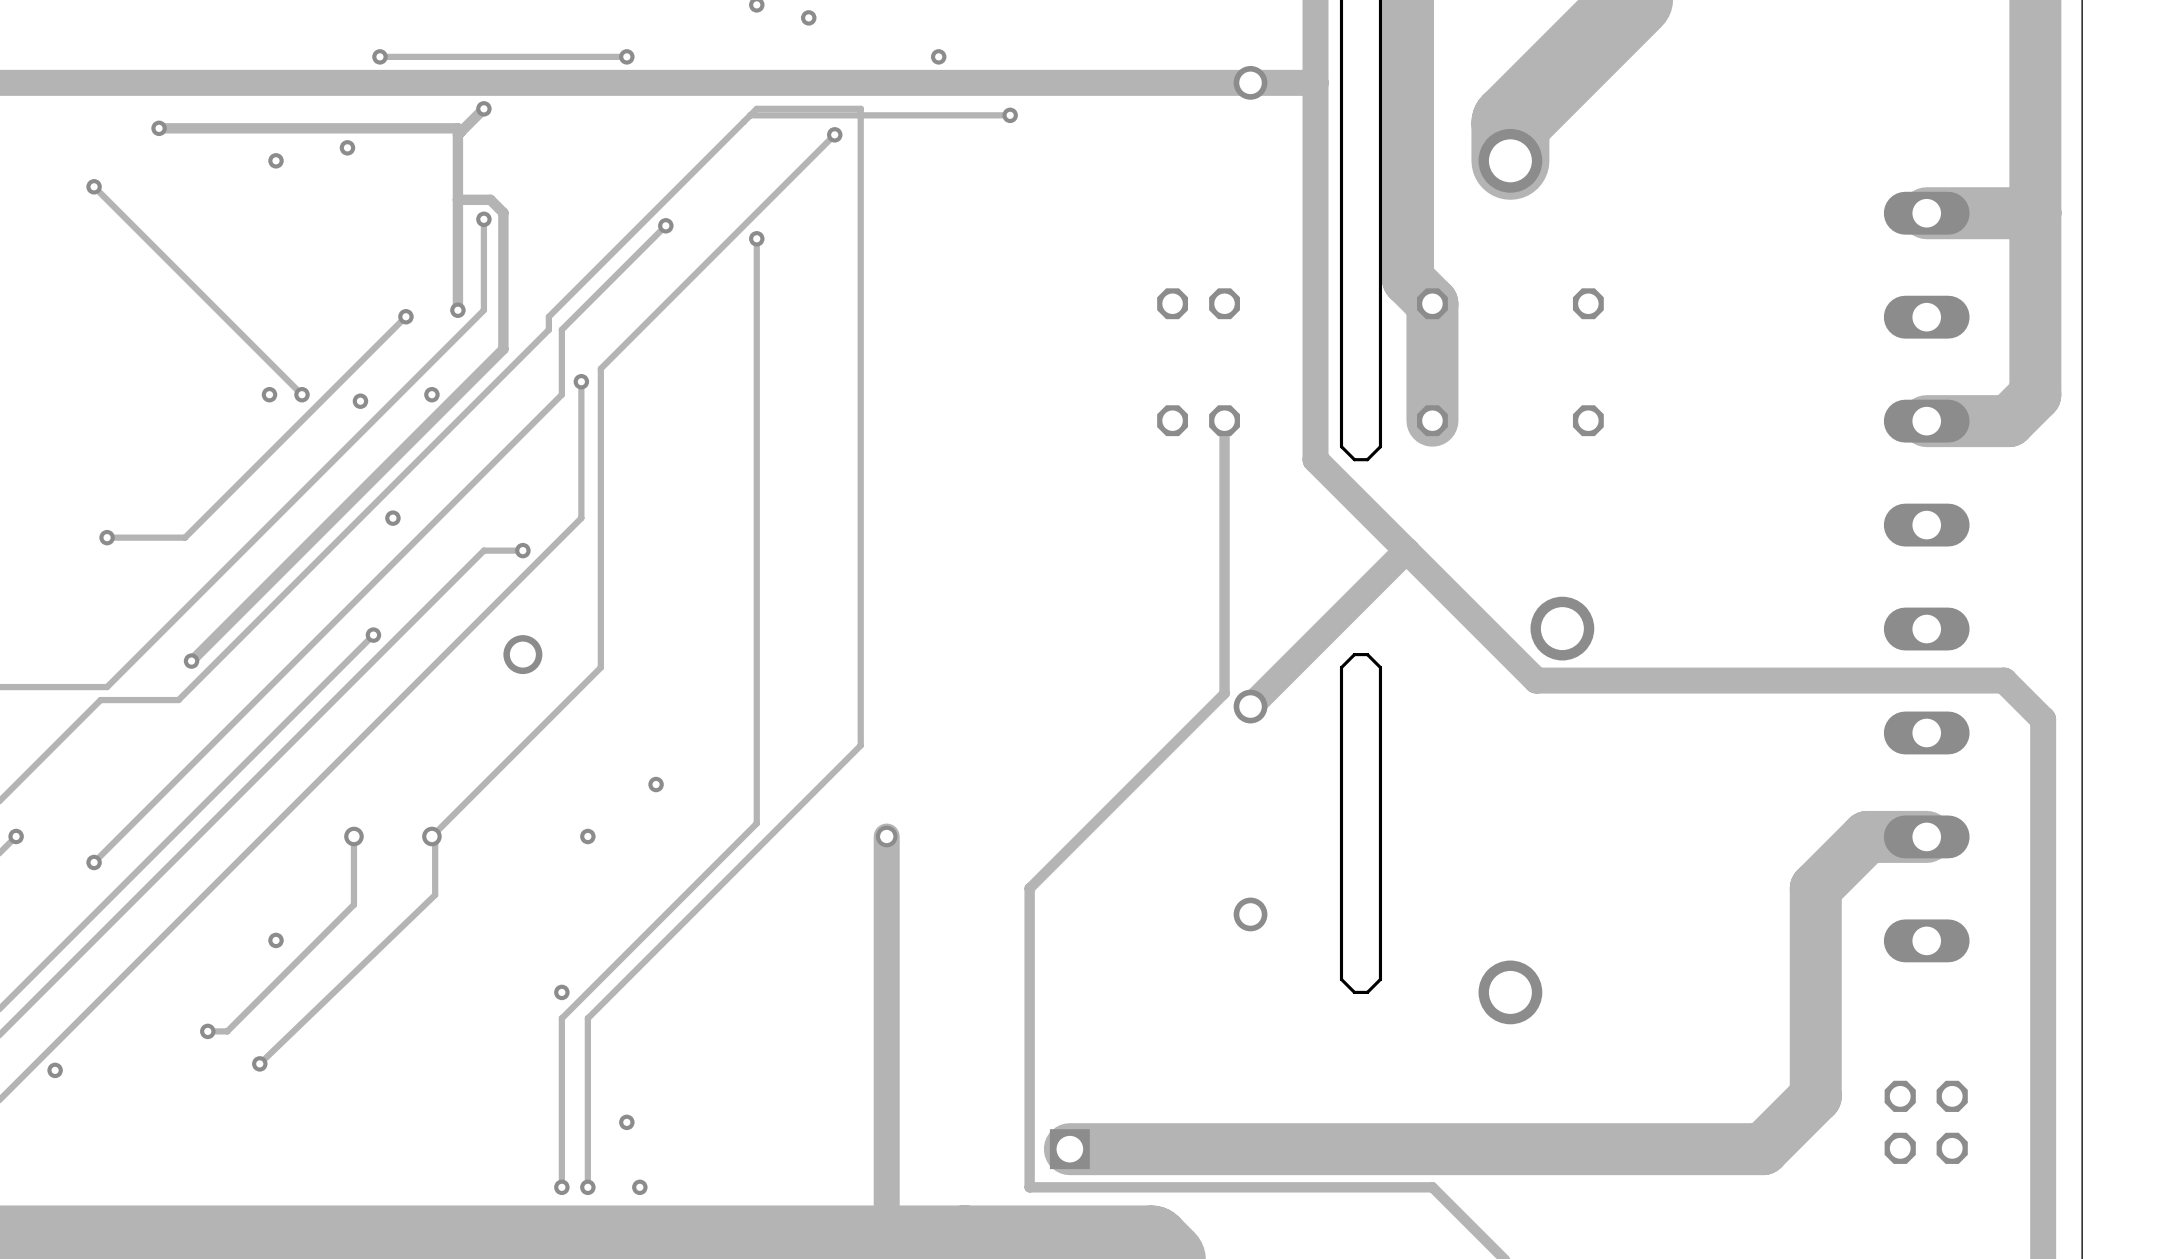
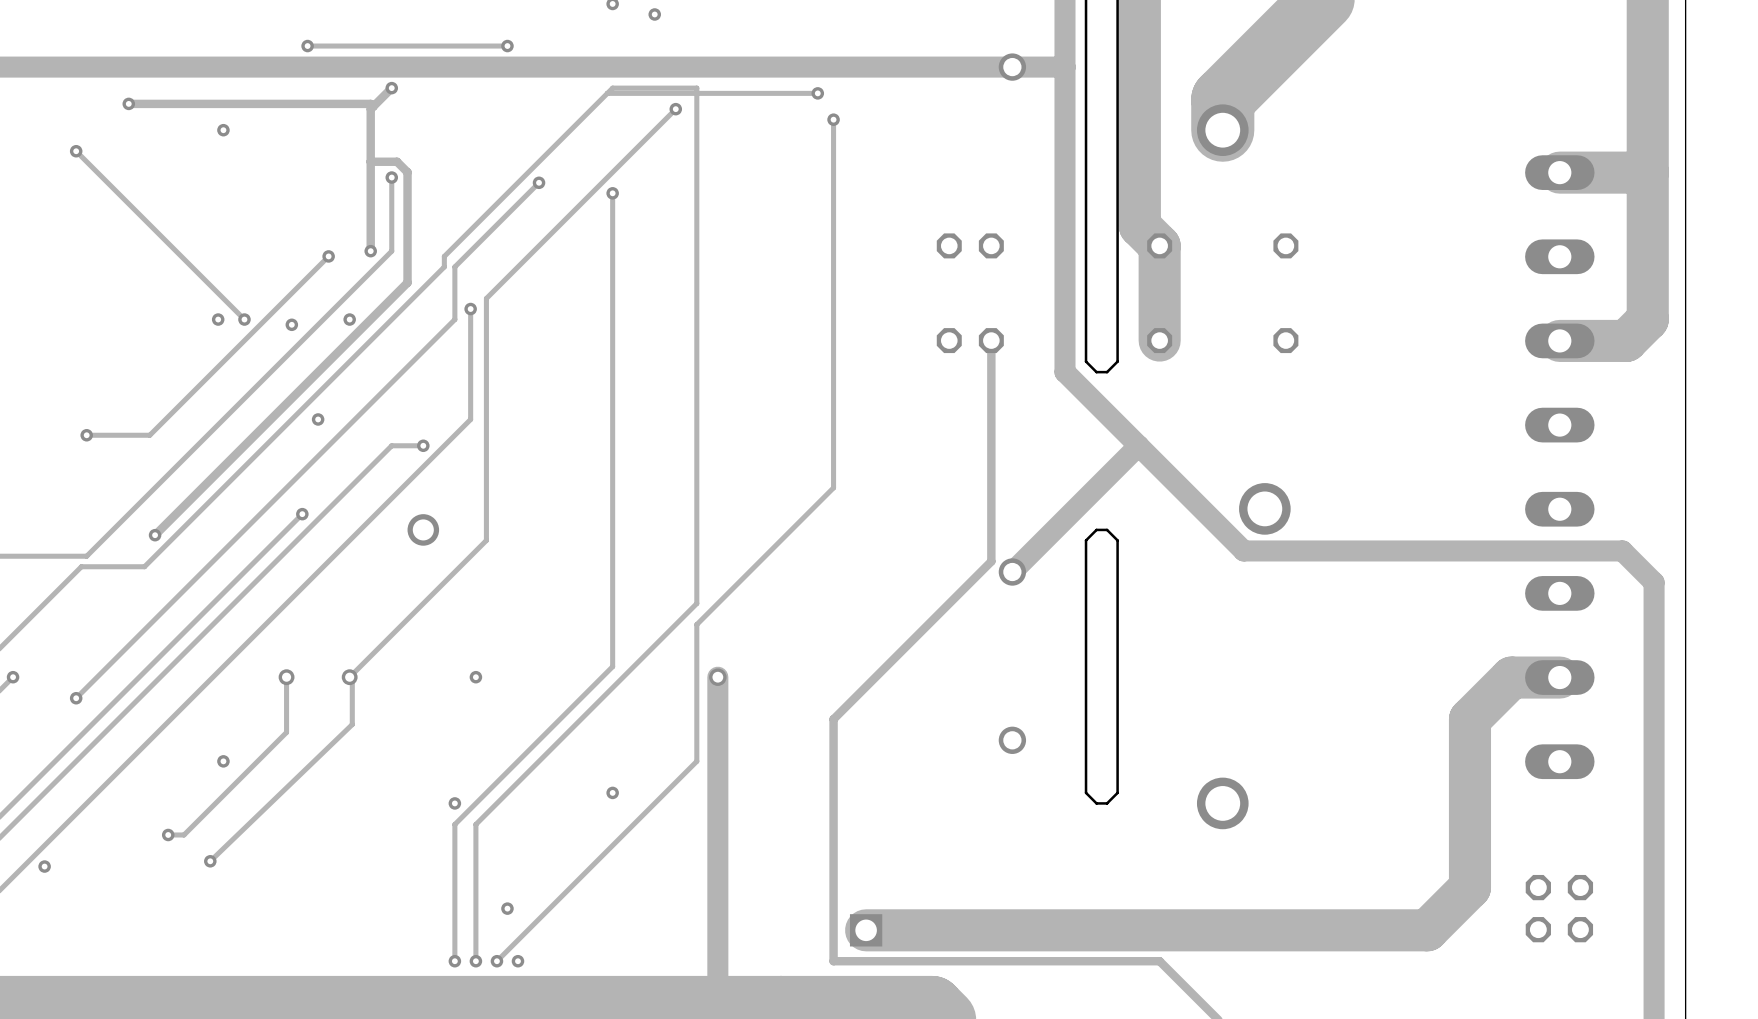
via: (938, 56) -> none
via: (347, 147) -> none
track: none -> (833, 119) (833, 487) (696, 624) (696, 761) (496, 961)
via: none -> (833, 119)
via: (656, 784) -> none
via: none -> (612, 792)
via: none -> (496, 961)

